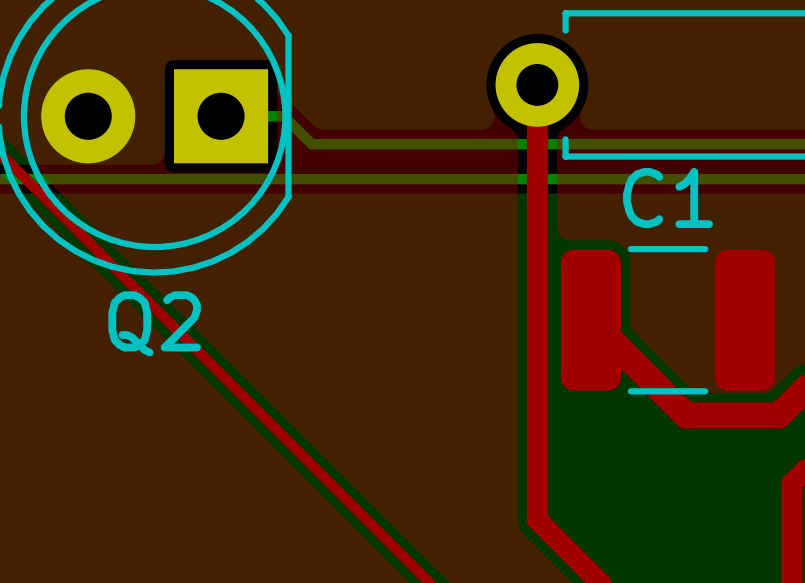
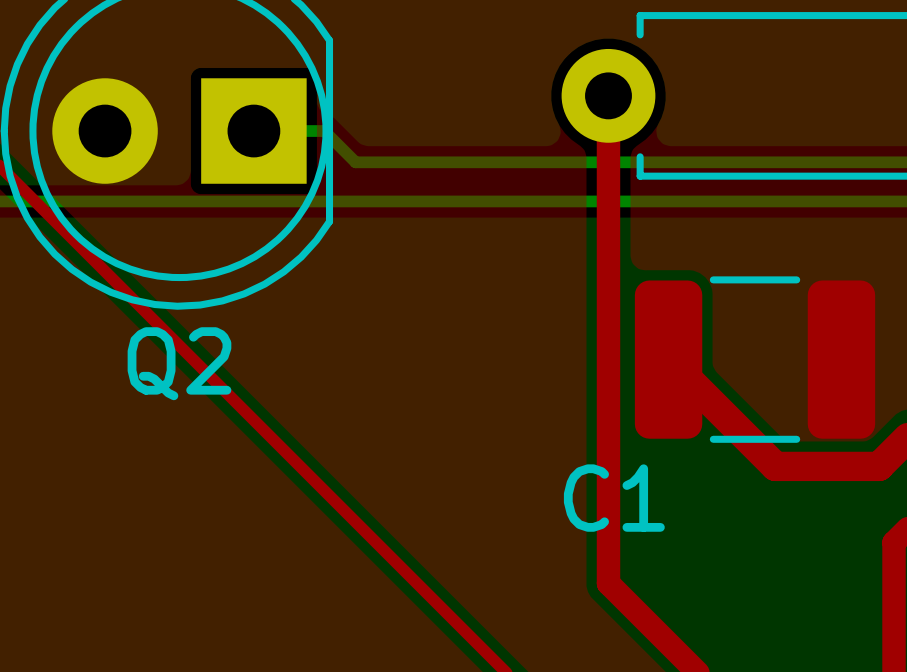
C1 name position: C1 (668, 197) -> C1 (614, 498)

